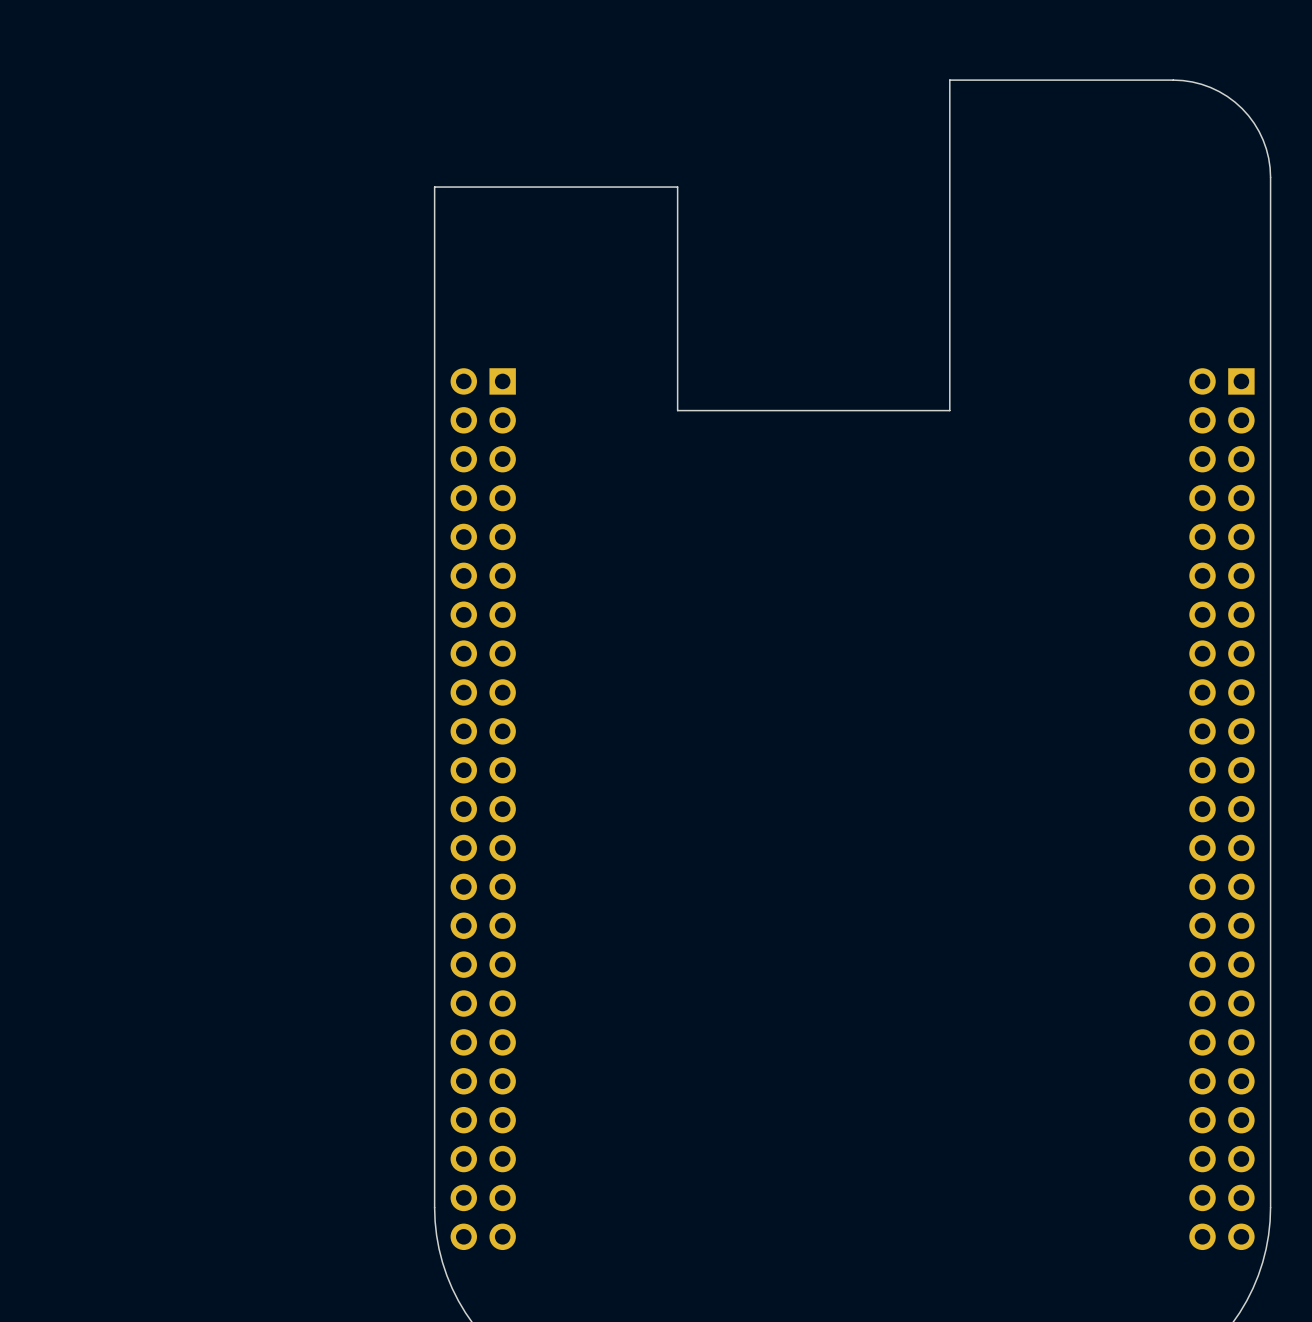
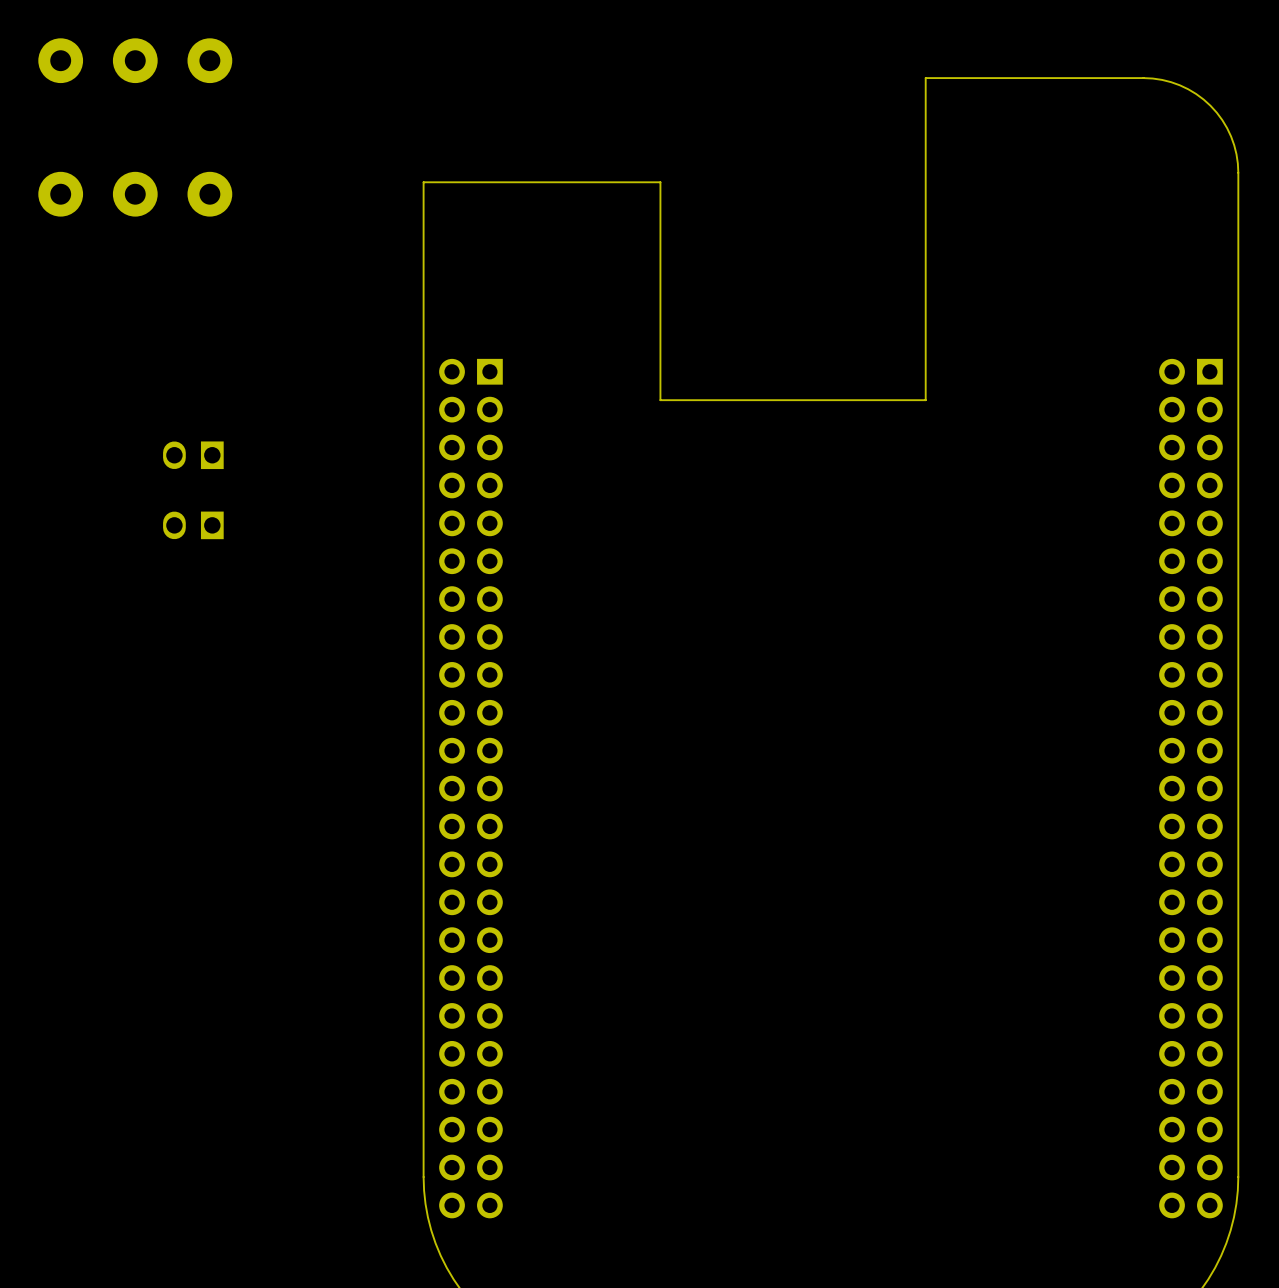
part: none -> (135, 60)
part: none -> (135, 194)
part: none -> (193, 455)
part: none -> (193, 525)

